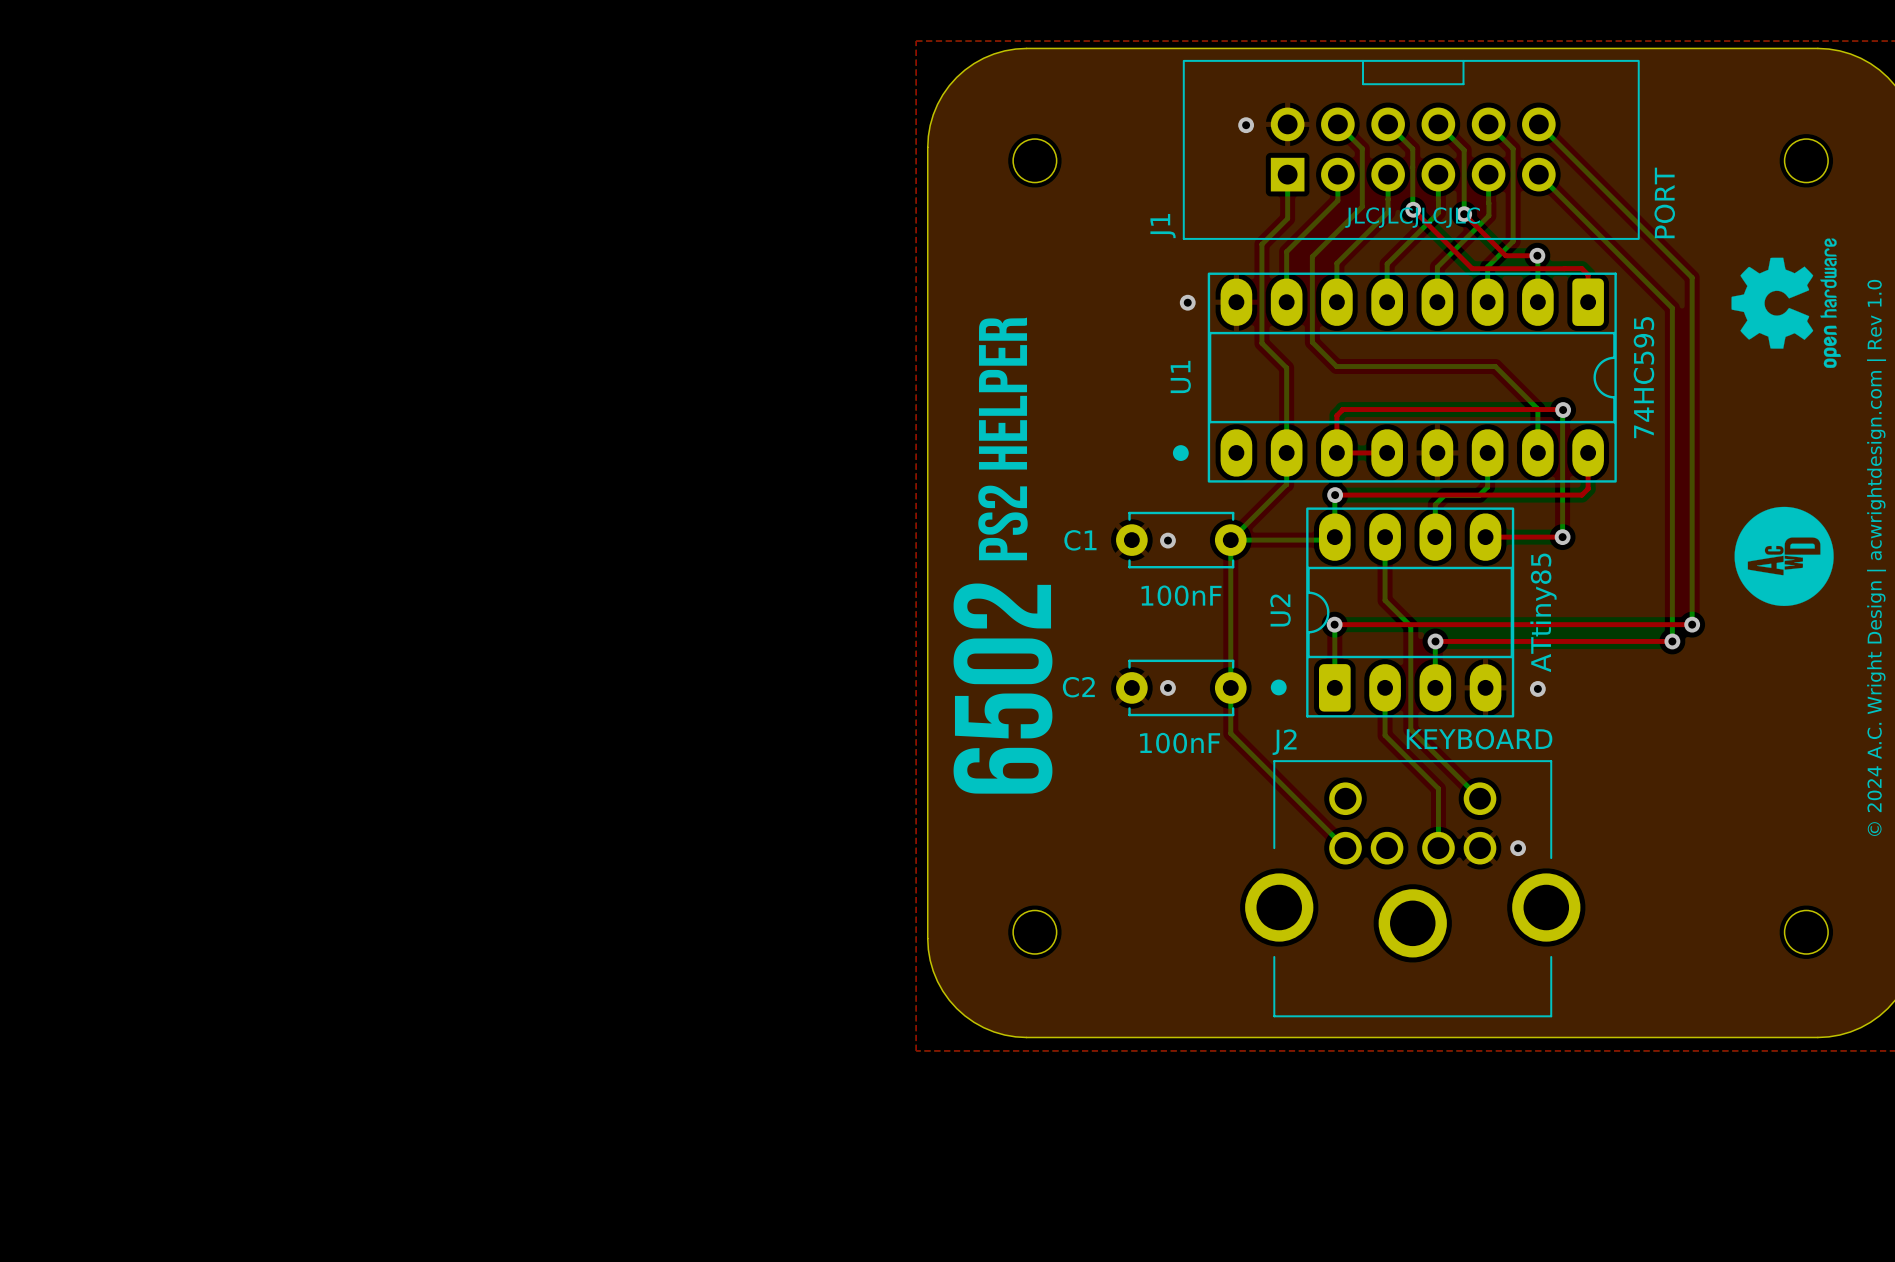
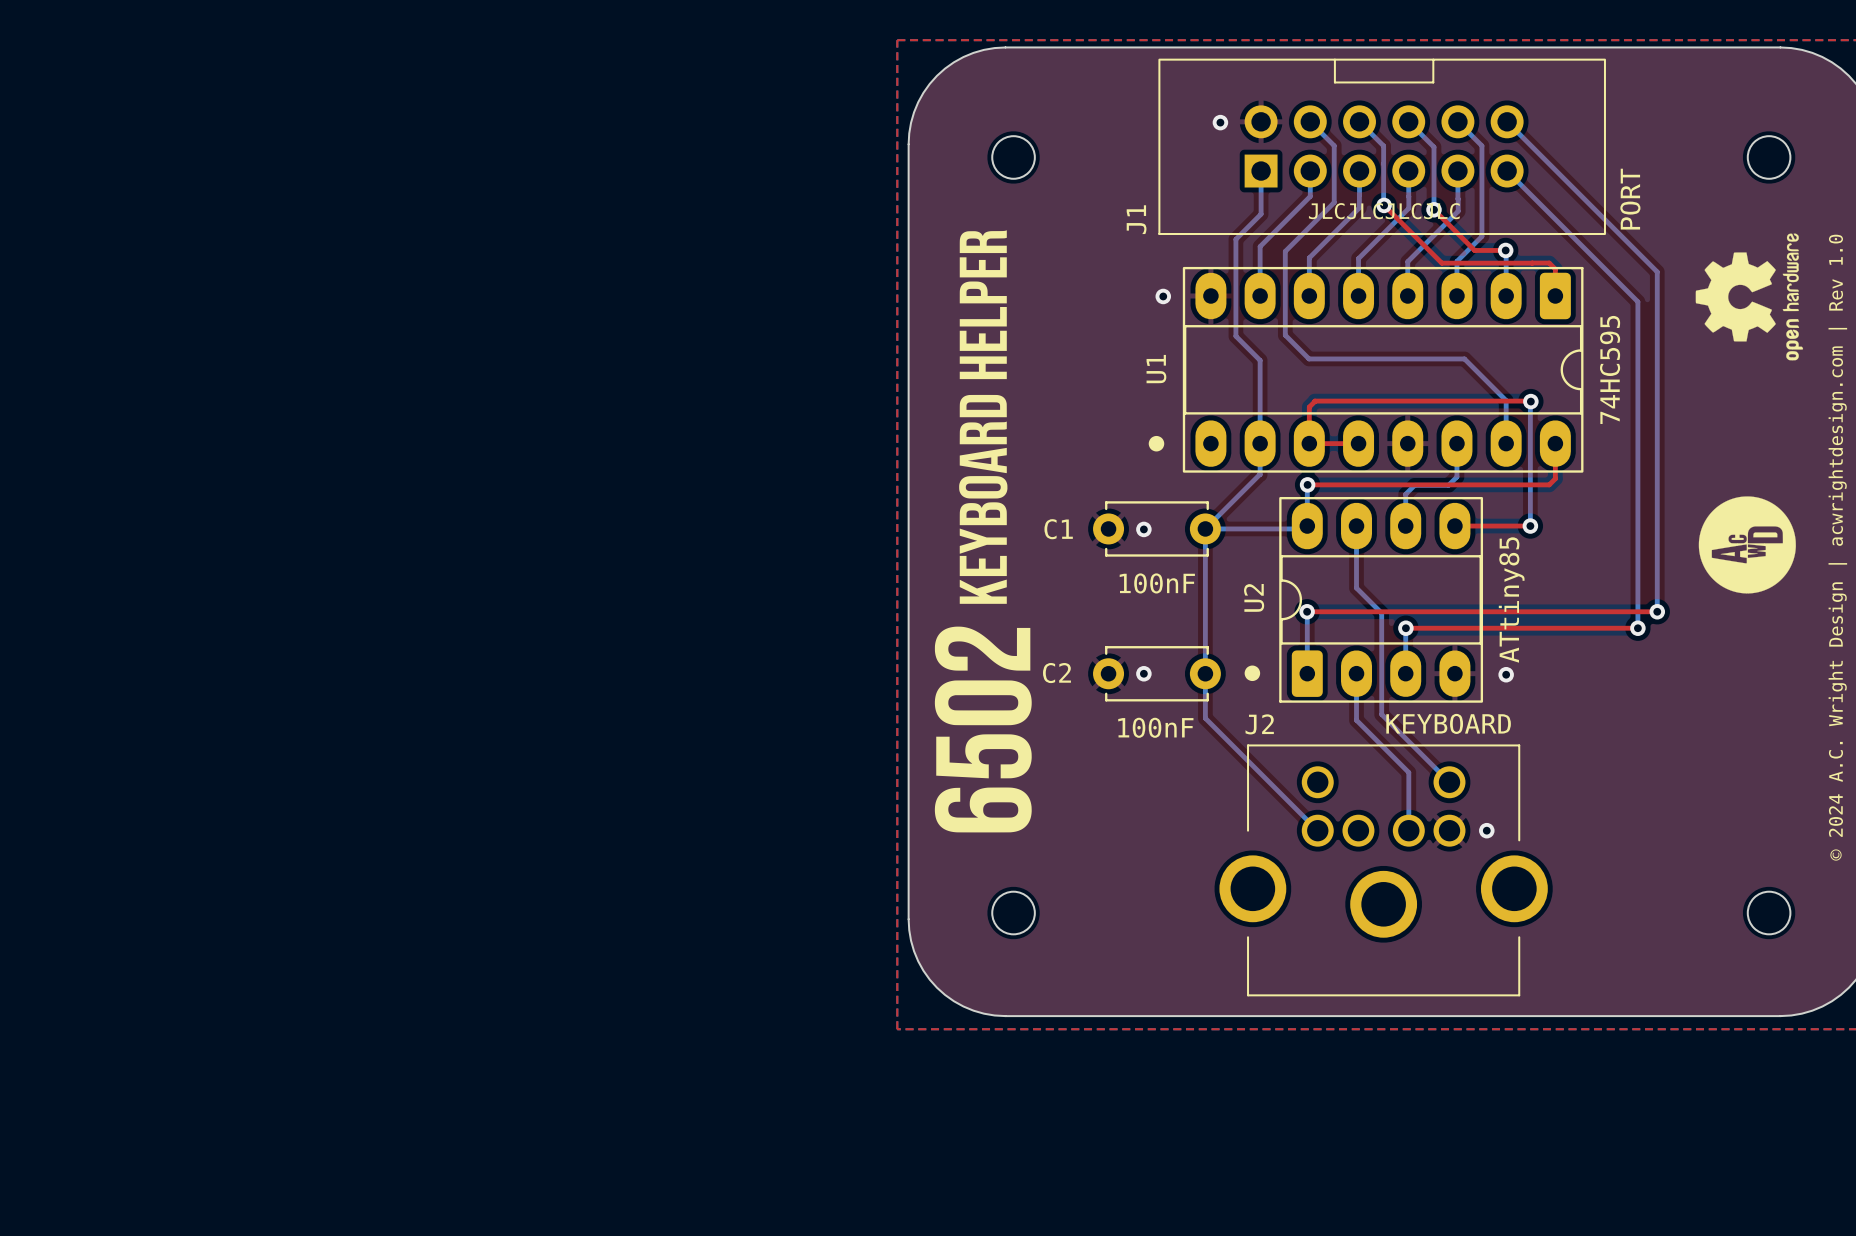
drawing shape: [953, 317, 1053, 794] -> [934, 230, 1032, 833]

